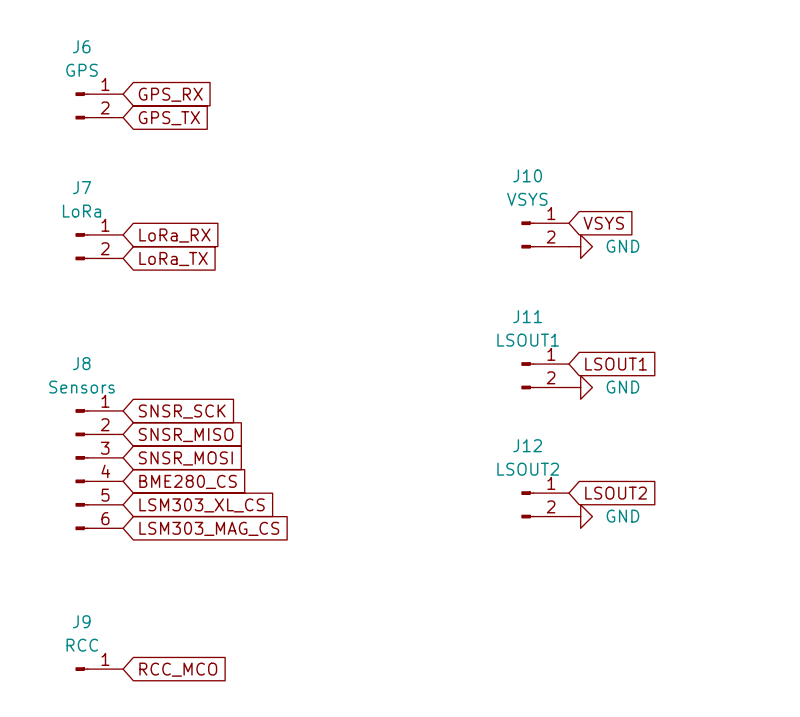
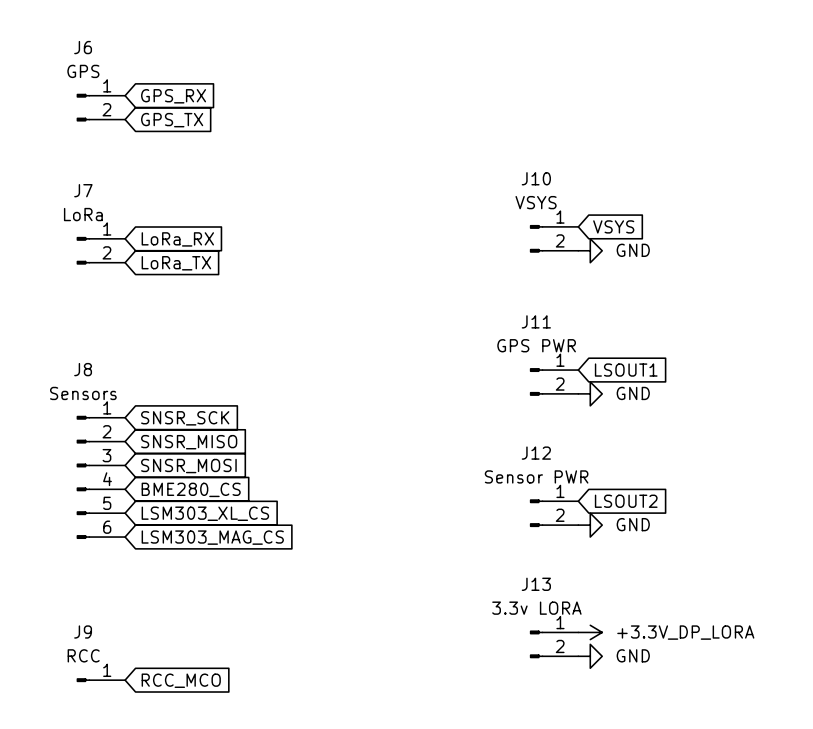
J11 value: LSOUT1 (528, 340) -> GPS PWR (536, 345)
J12 value: LSOUT2 (528, 469) -> Sensor PWR (536, 476)
power symbol: none -> +3.3V_DP_LORA (590, 632)
J13: none -> 3.3v LORA (554, 644)
power symbol: none -> GND (590, 656)

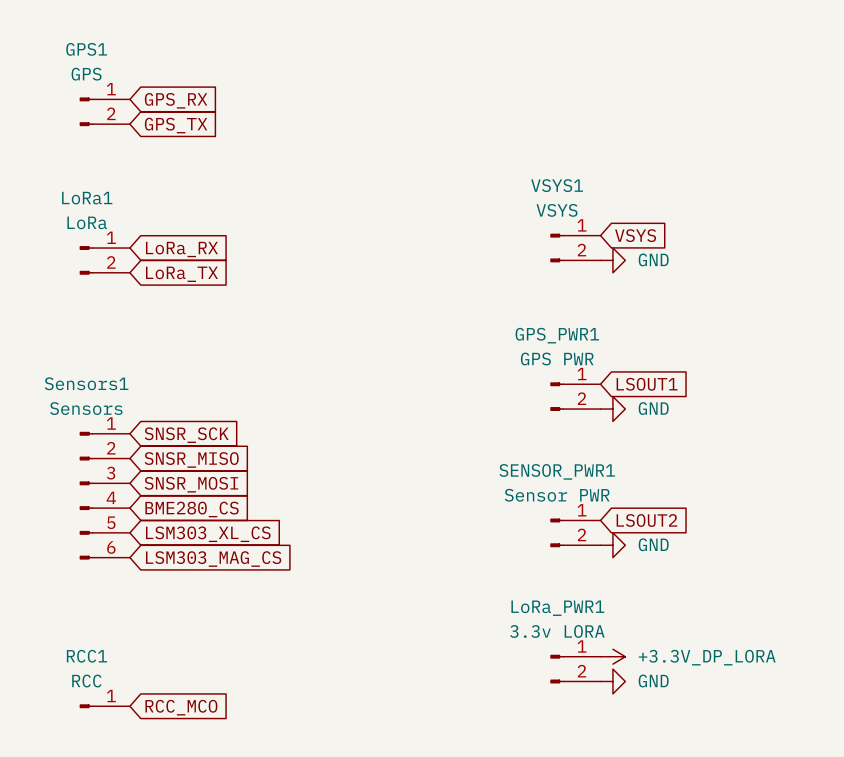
J6 name: J6 (83, 47) -> GPS1 (86, 49)
J10 name: J10 (536, 178) -> VSYS1 (557, 185)
J7 name: J7 (83, 190) -> LoRa1 (87, 198)
J11 name: J11 (536, 321) -> GPS_PWR1 (557, 335)
J8 name: J8 (83, 369) -> Sensors1 (86, 383)
J12 name: J12 (536, 453) -> SENSOR_PWR1 (557, 471)
J13 name: J13 (536, 584) -> LoRa_PWR1 (557, 608)
J9 name: J9 (83, 632) -> RCC1 (86, 656)

